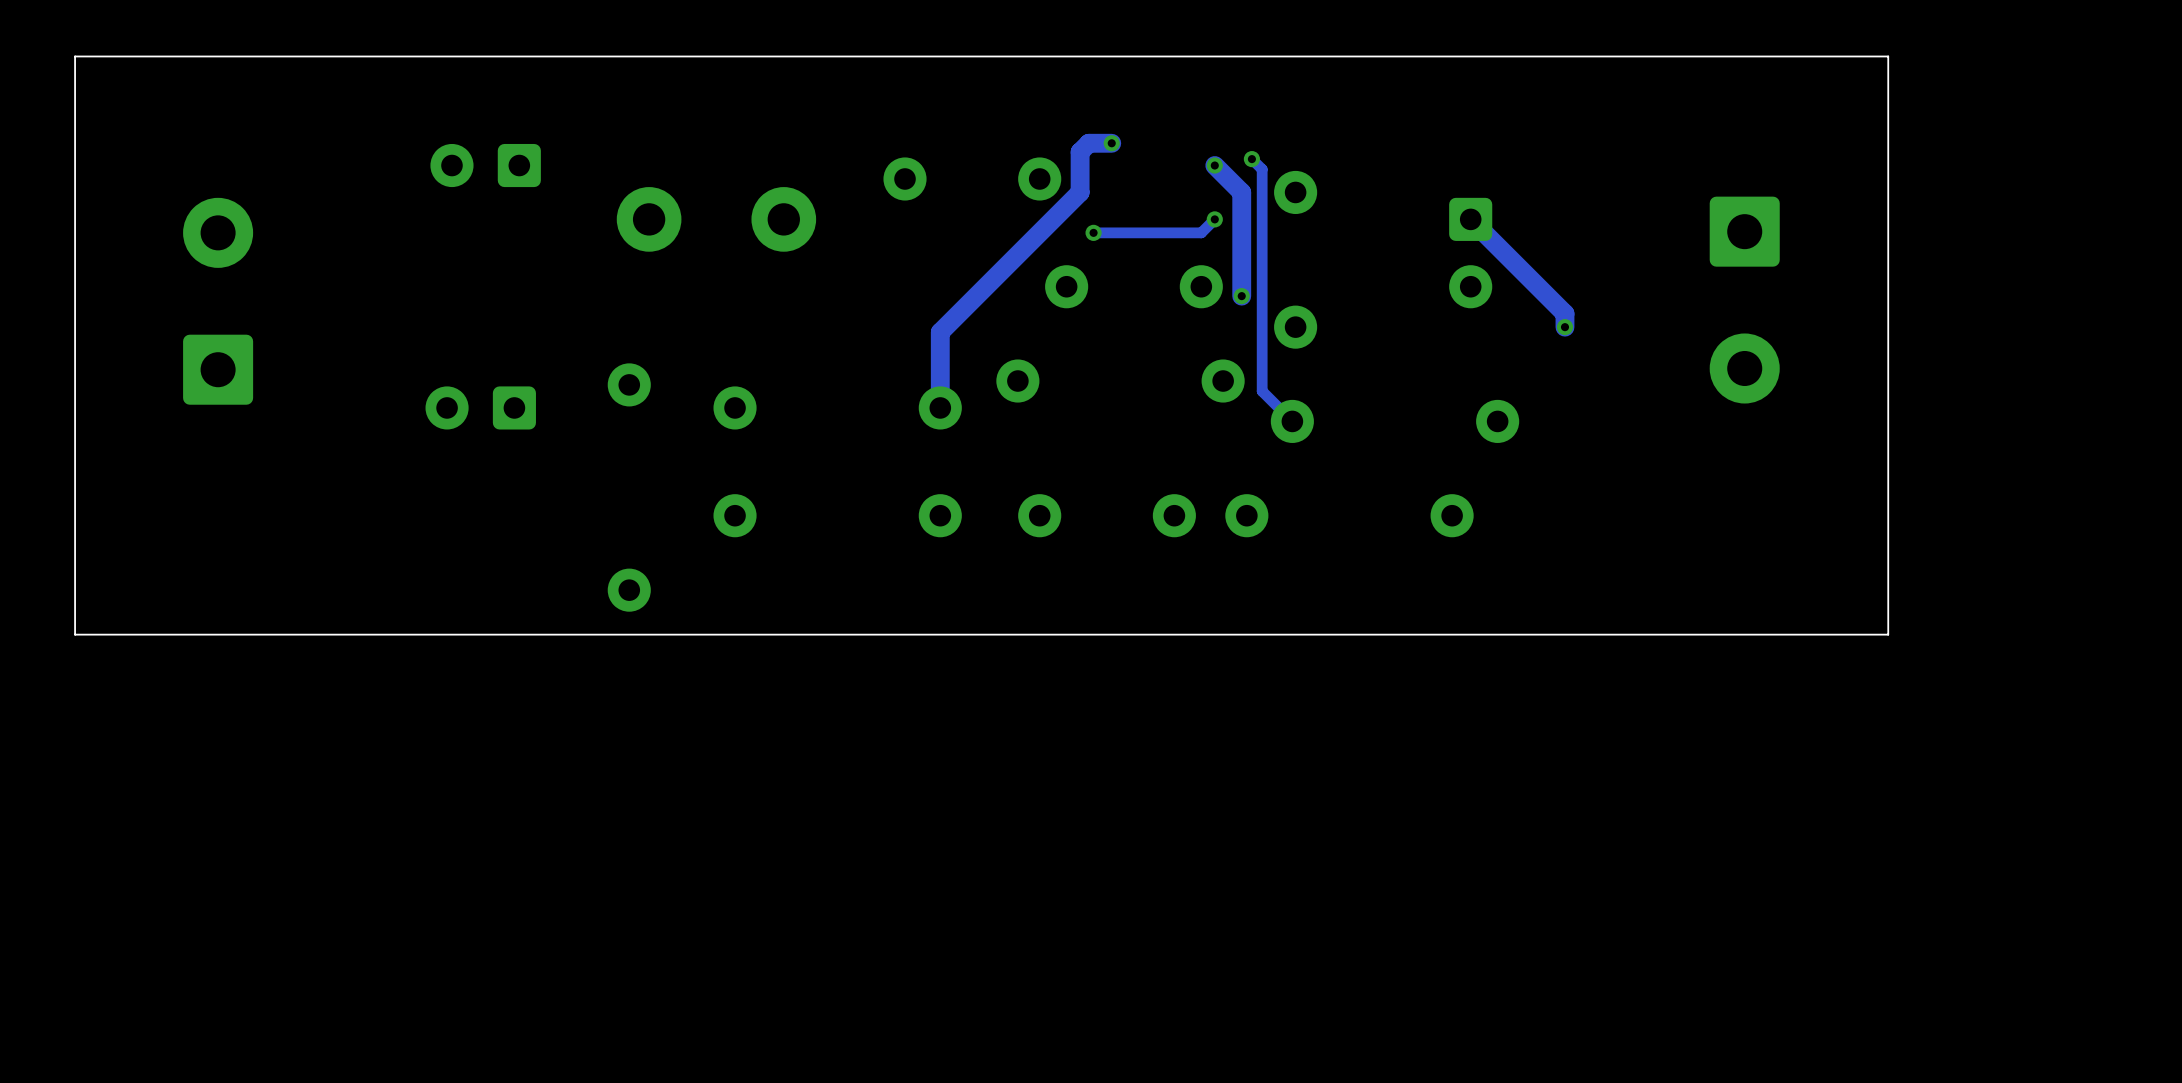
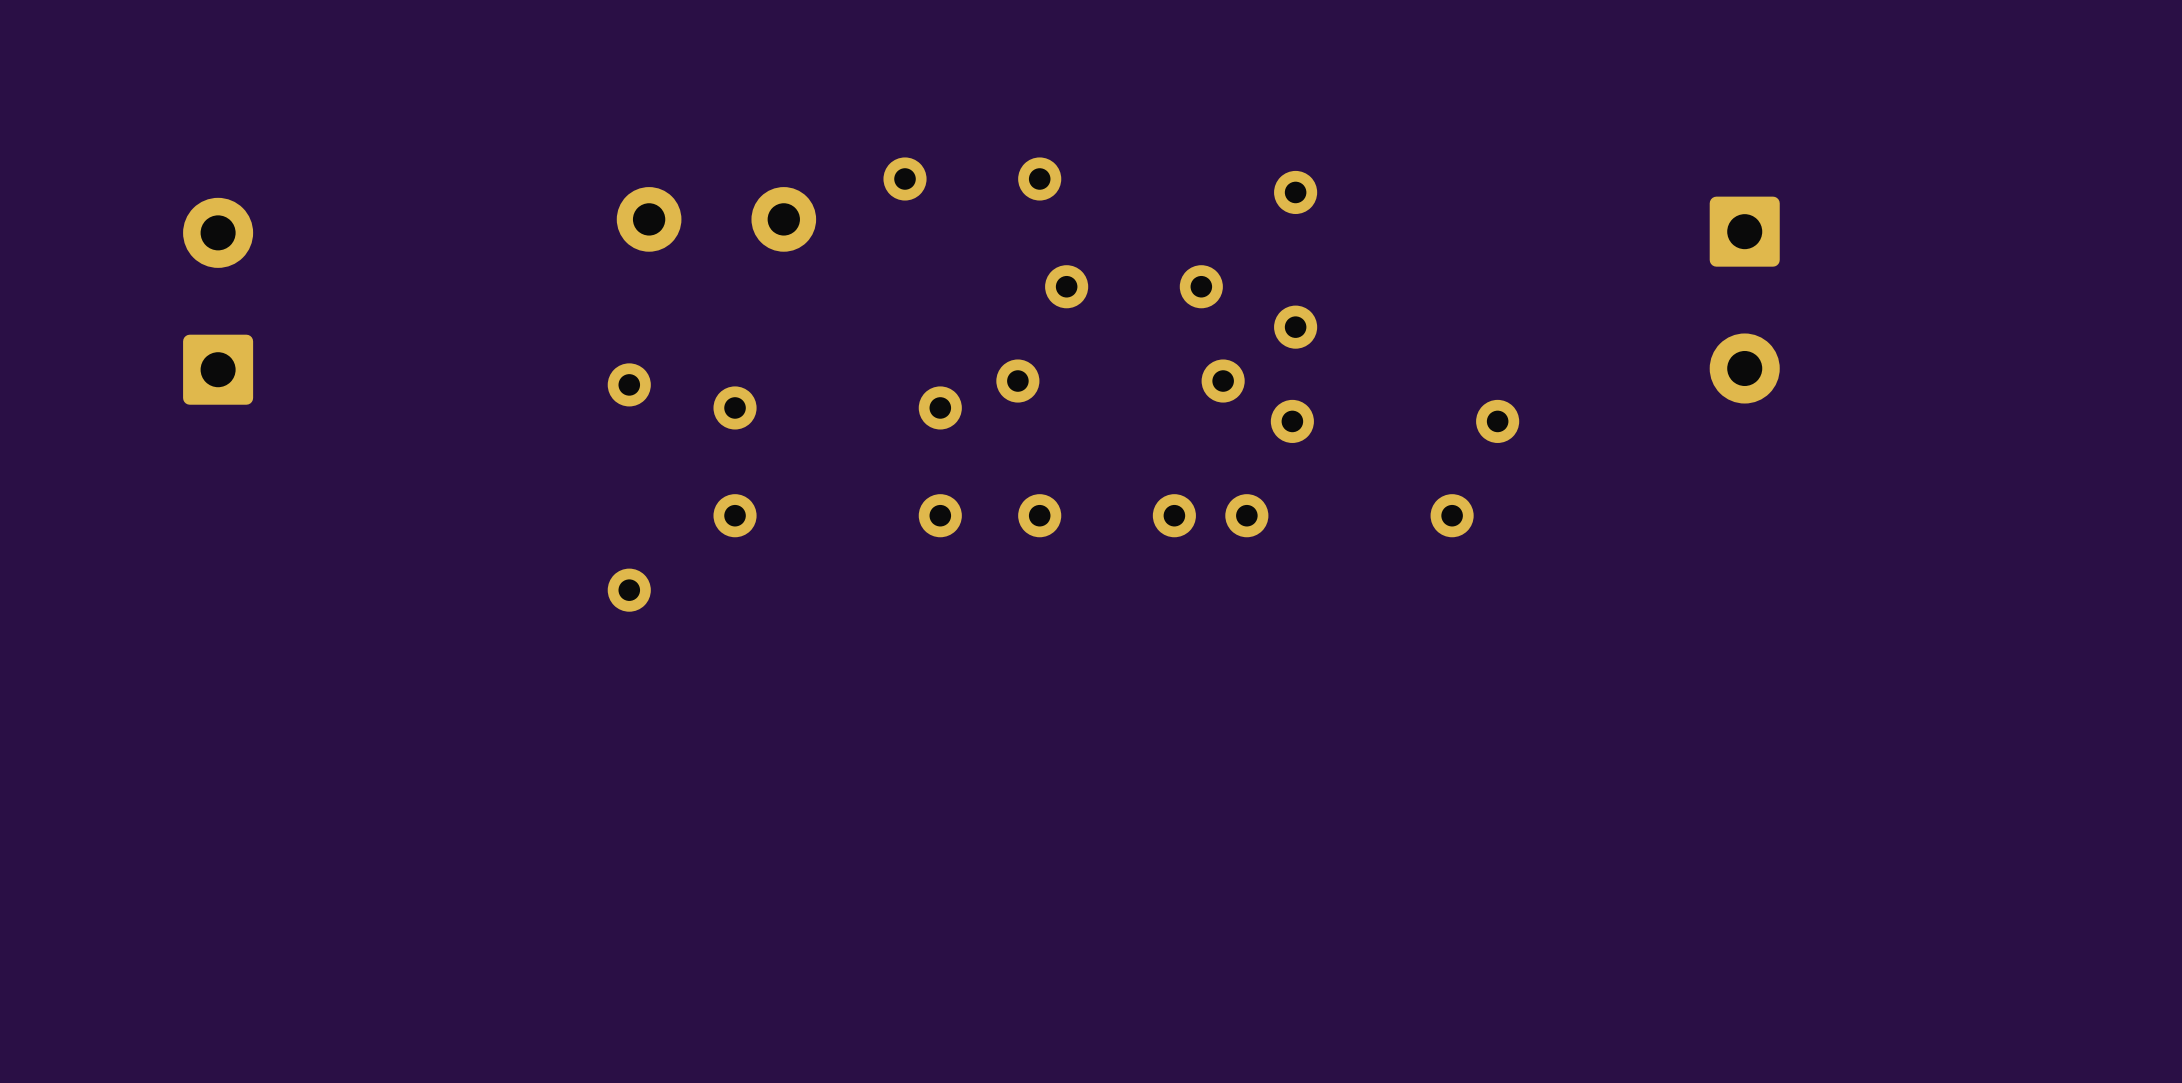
board edge: (1888, 56) (75, 56) (75, 634) (1888, 634) (1888, 56) -> none
track: (1111, 143) (1088, 143) (1080, 152) (1080, 192) (940, 332) (940, 407) -> none
via: (1111, 143) -> none
track: (1251, 159) (1262, 169) (1262, 391) (1292, 421) -> none
via: (1251, 159) -> none
part: (485, 165) -> none
track: (1214, 165) (1241, 192) (1241, 296) -> none
via: (1214, 165) -> none
track: (1214, 219) (1201, 232) (1093, 232) -> none
via: (1214, 219) -> none
track: (1470, 219) (1564, 313) (1564, 327) -> none
via: (1093, 232) -> none
part: (1470, 253) -> none
via: (1241, 296) -> none
via: (1564, 327) -> none
part: (480, 407) -> none

